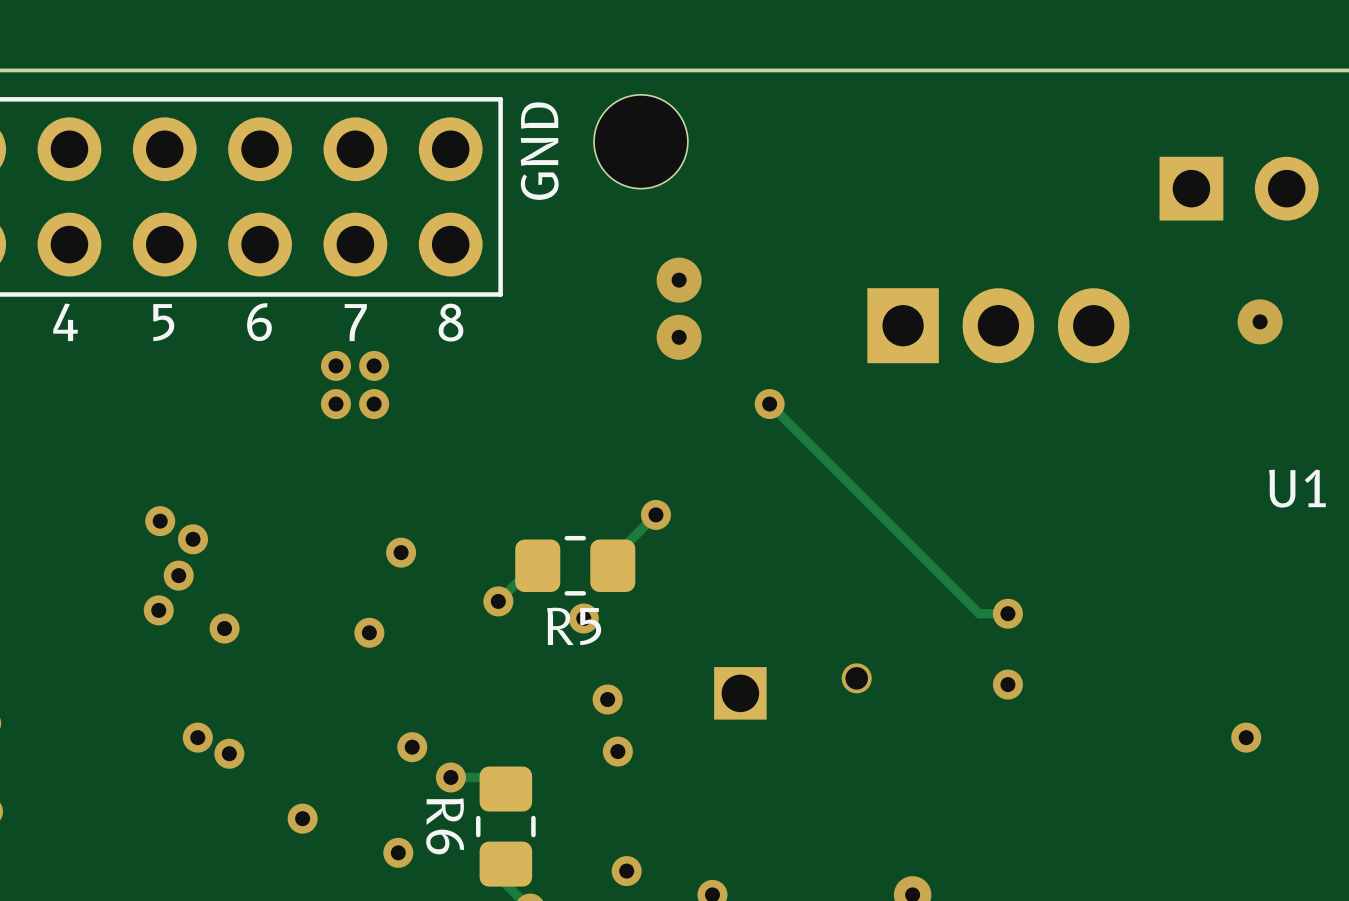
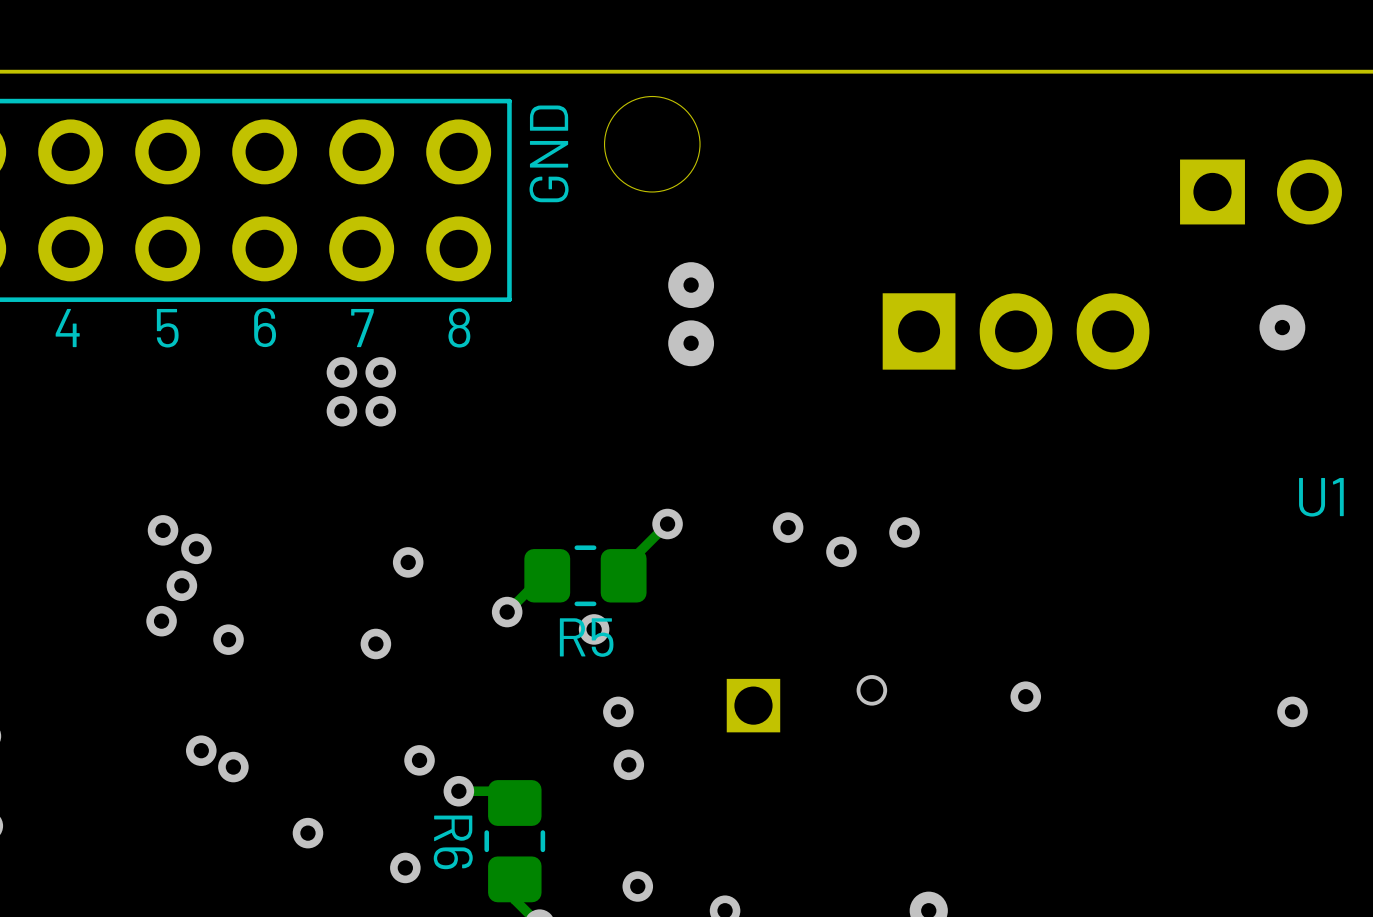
track: (769, 404) (979, 613) (1007, 613) -> none
via: (769, 404) -> none
via: none -> (788, 527)
via: none -> (904, 532)
via: none -> (841, 551)
via: (1007, 613) -> none
via position: (1246, 737) -> (1292, 711)

